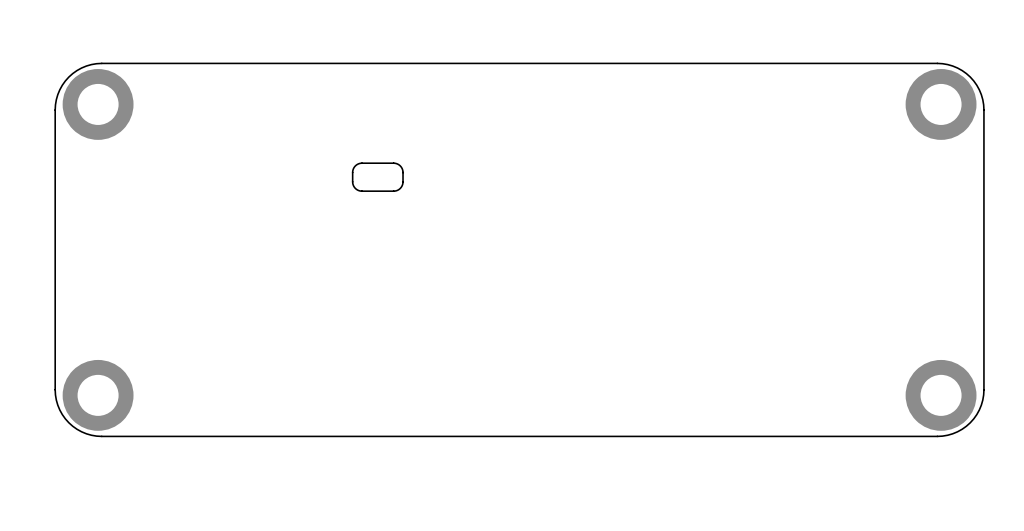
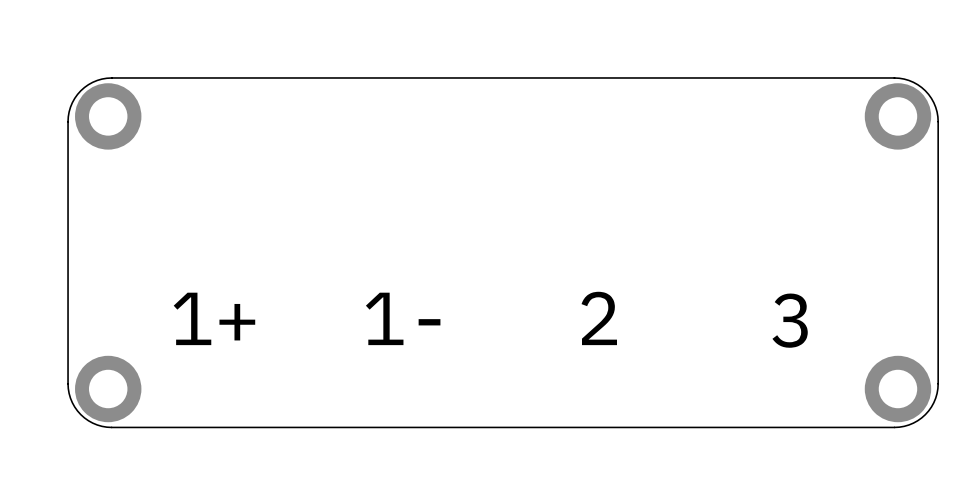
board edge: (393, 163) (357, 164) (352, 171) (353, 186) (360, 191) (398, 189) (402, 184) (402, 171) (400, 165) (393, 163) -> none
text: none -> 1+ (214, 318)
text: none -> 1- (403, 318)
text: none -> 2 (599, 318)
text: none -> 3 (790, 320)

